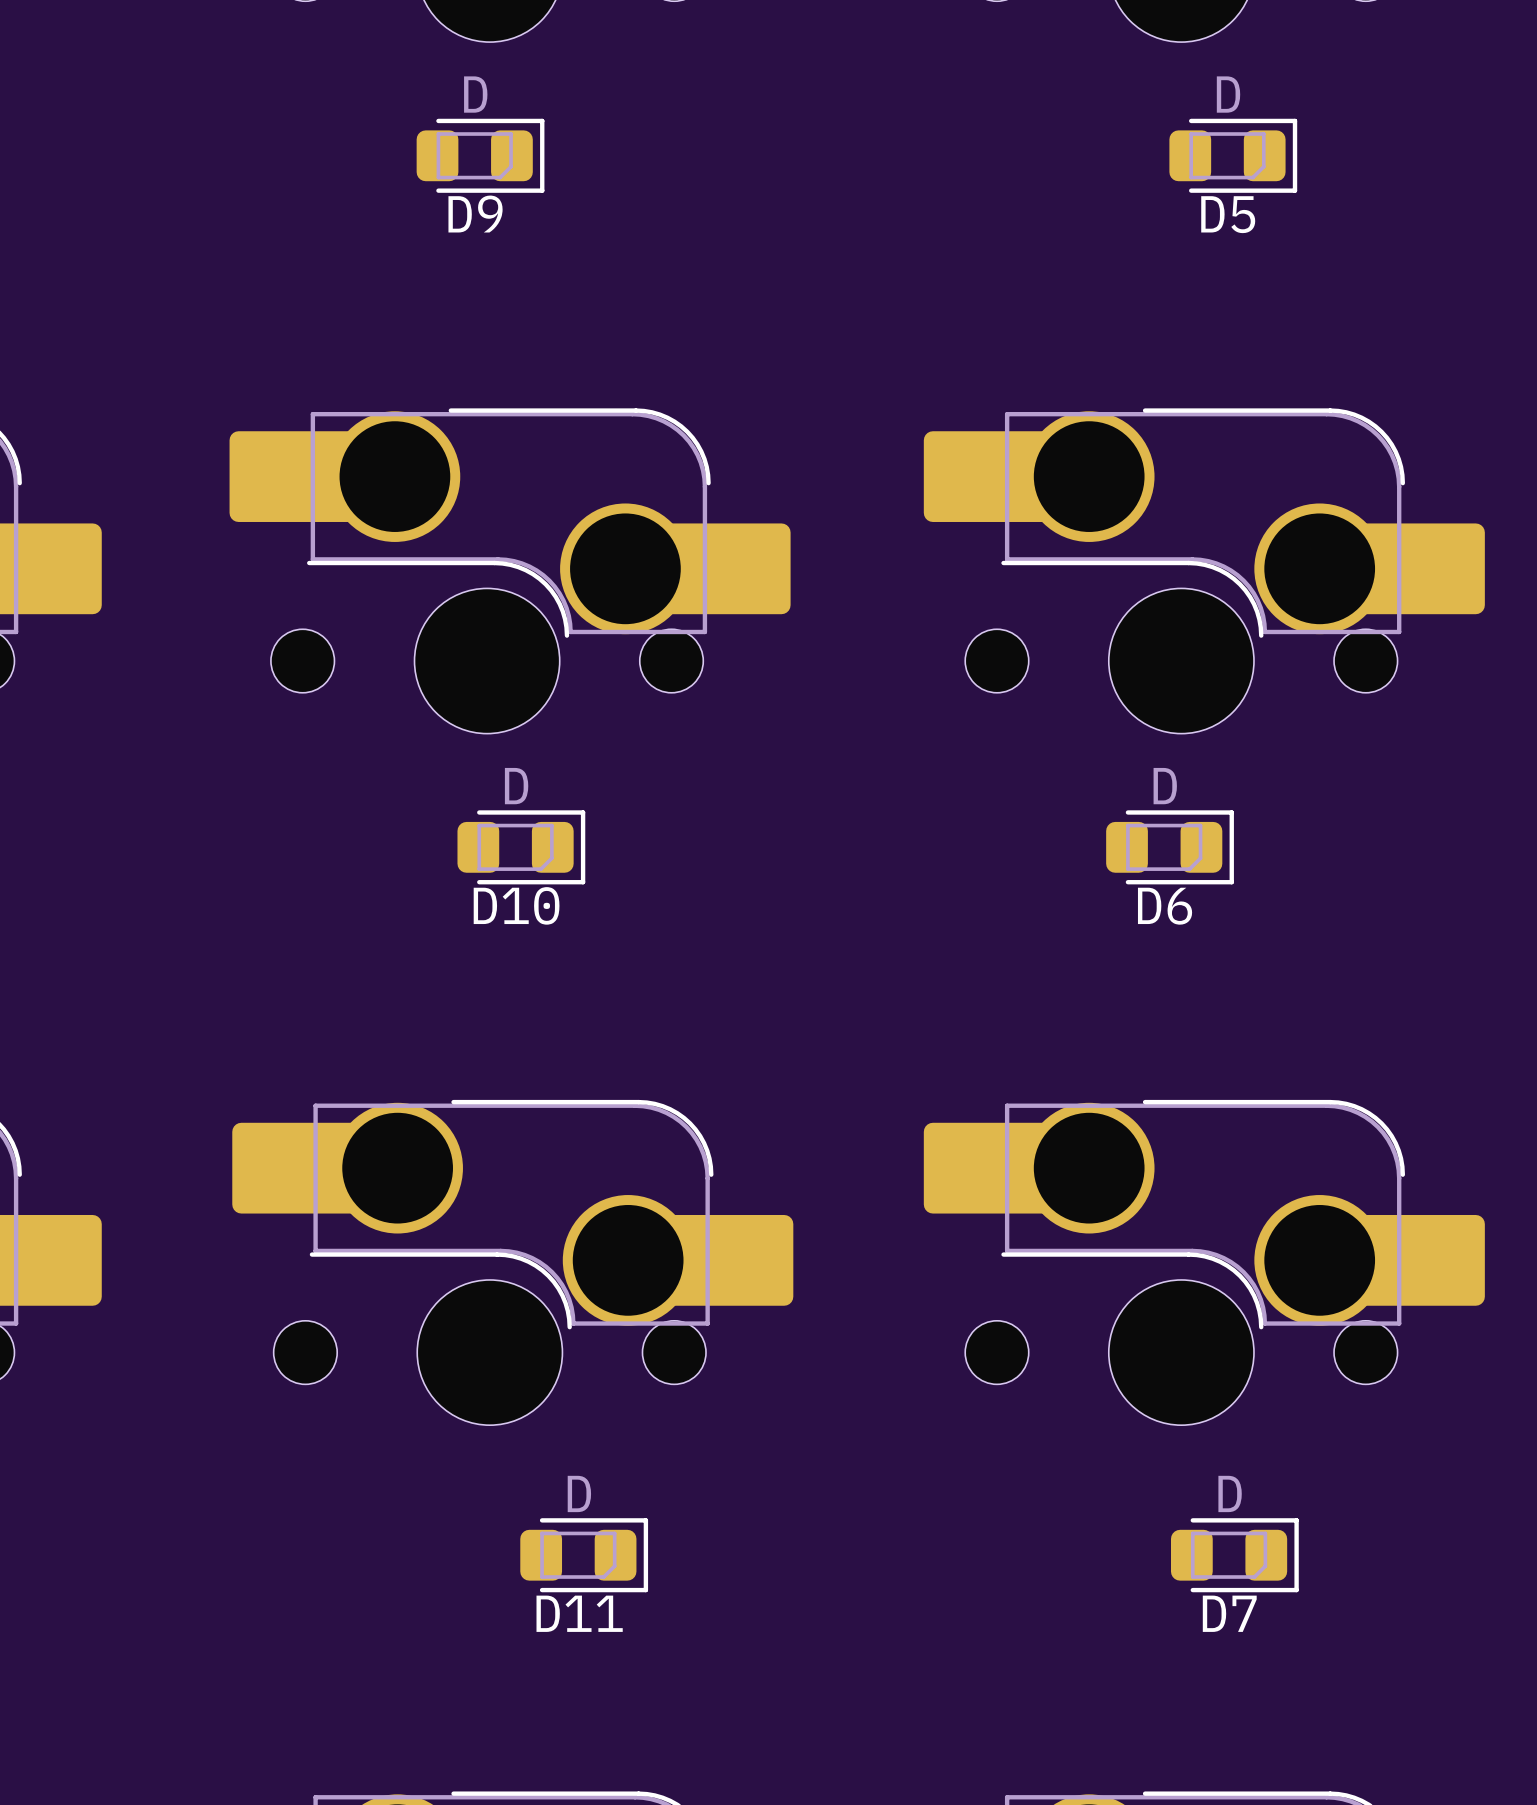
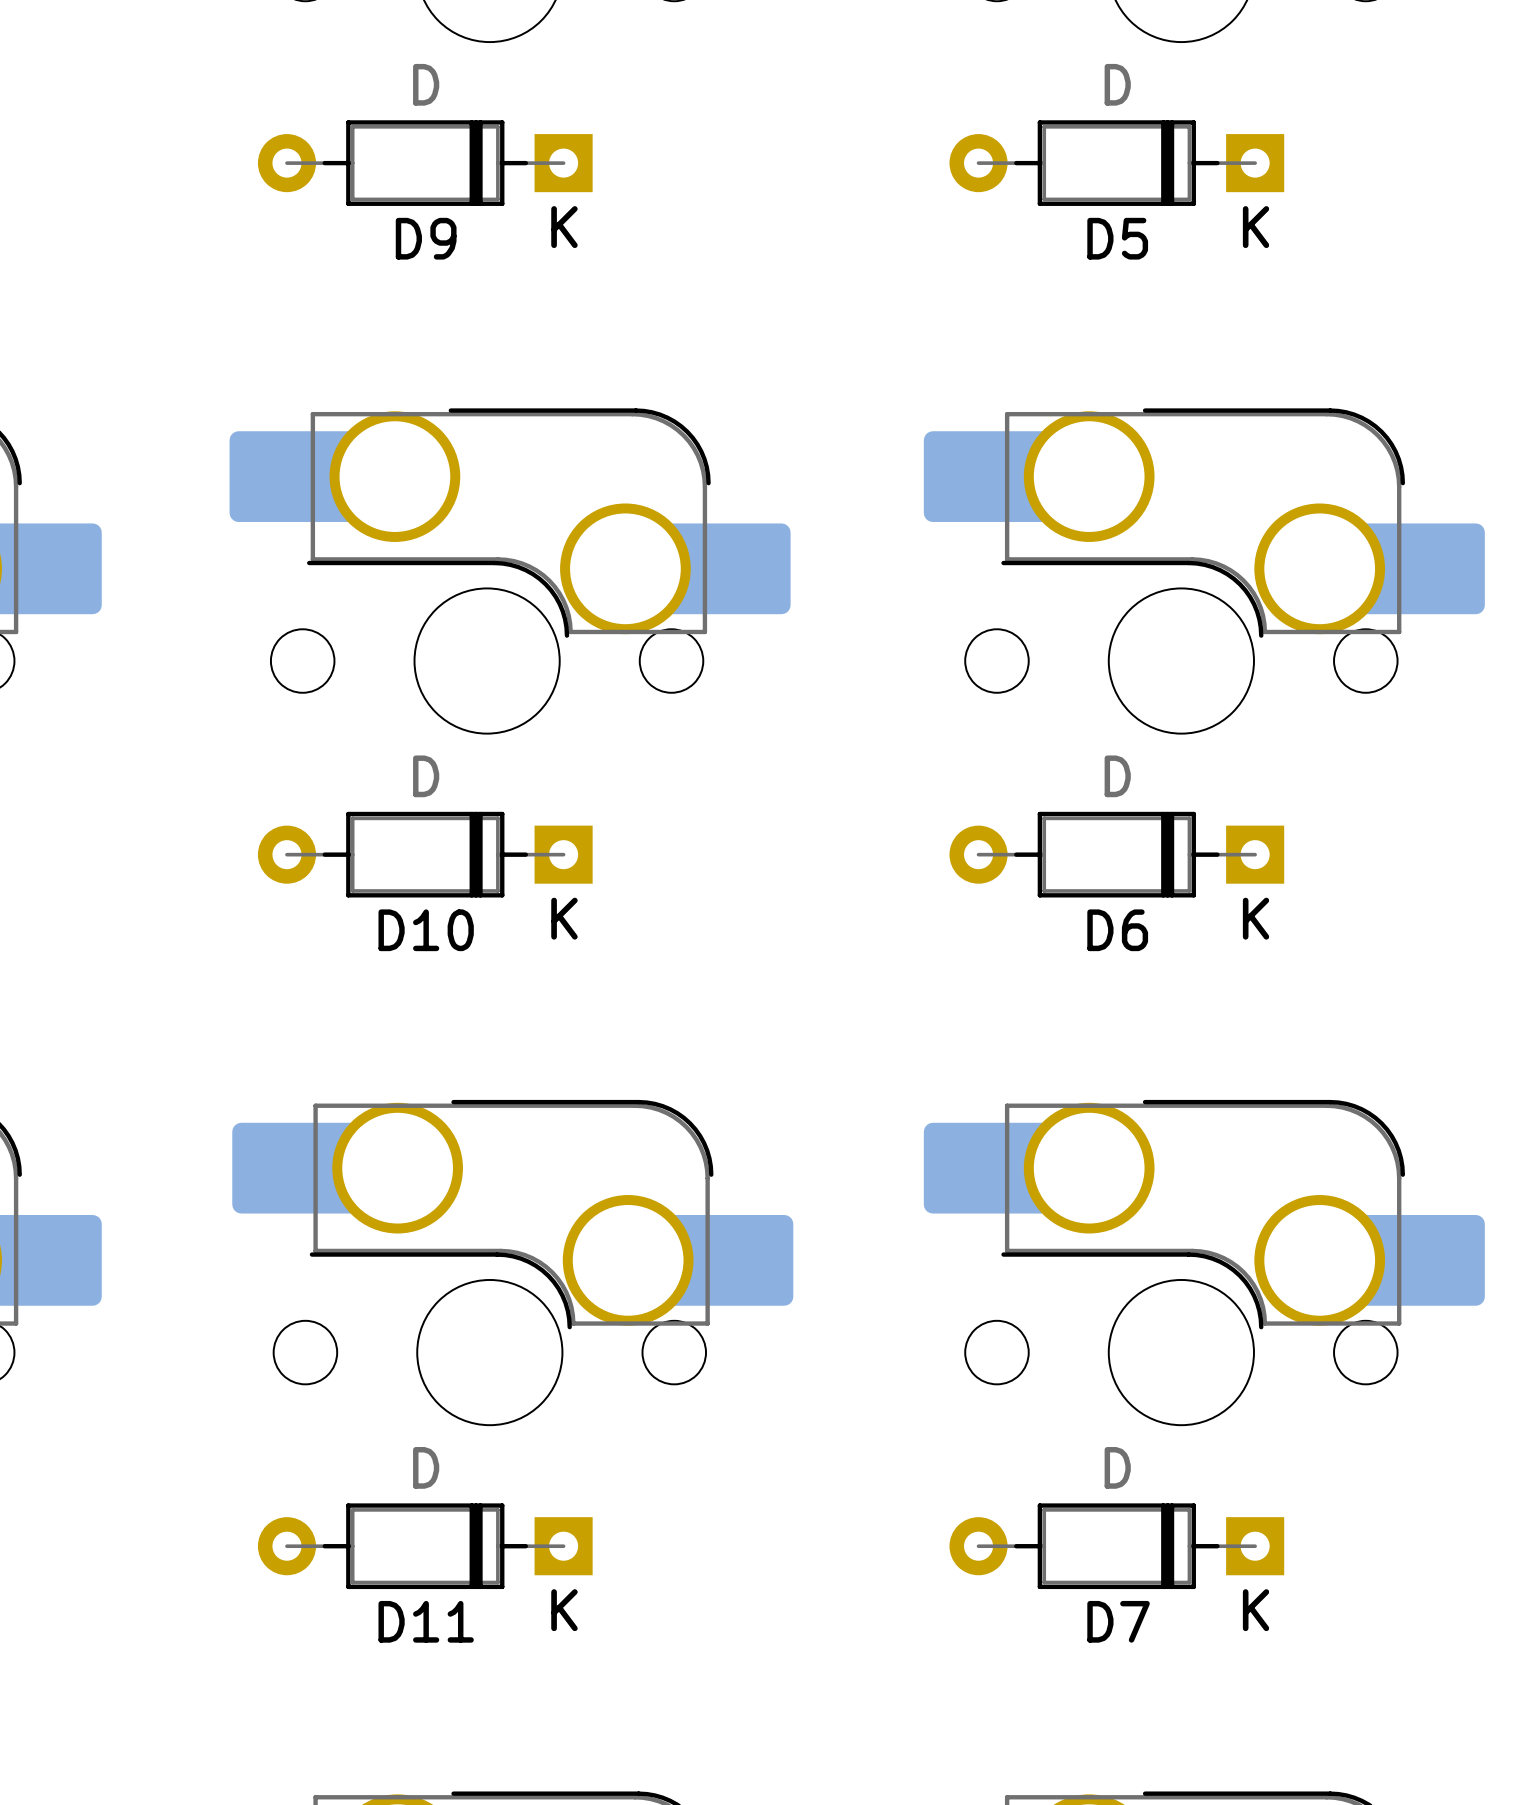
D9 footprint: [416, 118, 545, 193] -> [257, 120, 593, 206]
D5 footprint: [1169, 118, 1298, 193] -> [949, 120, 1285, 206]
D10 footprint: [457, 810, 586, 885] -> [257, 811, 593, 898]
D6 footprint: [1106, 810, 1234, 885] -> [949, 811, 1285, 898]
D11 footprint: [520, 1518, 649, 1593] -> [257, 1503, 593, 1590]
D7 footprint: [1170, 1518, 1299, 1593] -> [949, 1503, 1285, 1590]

